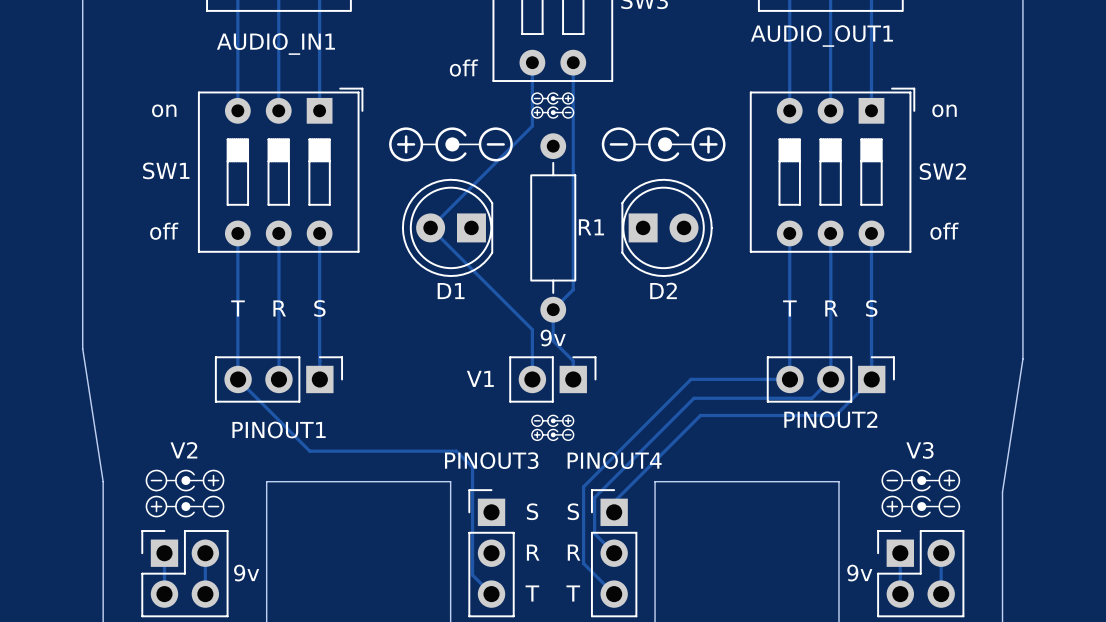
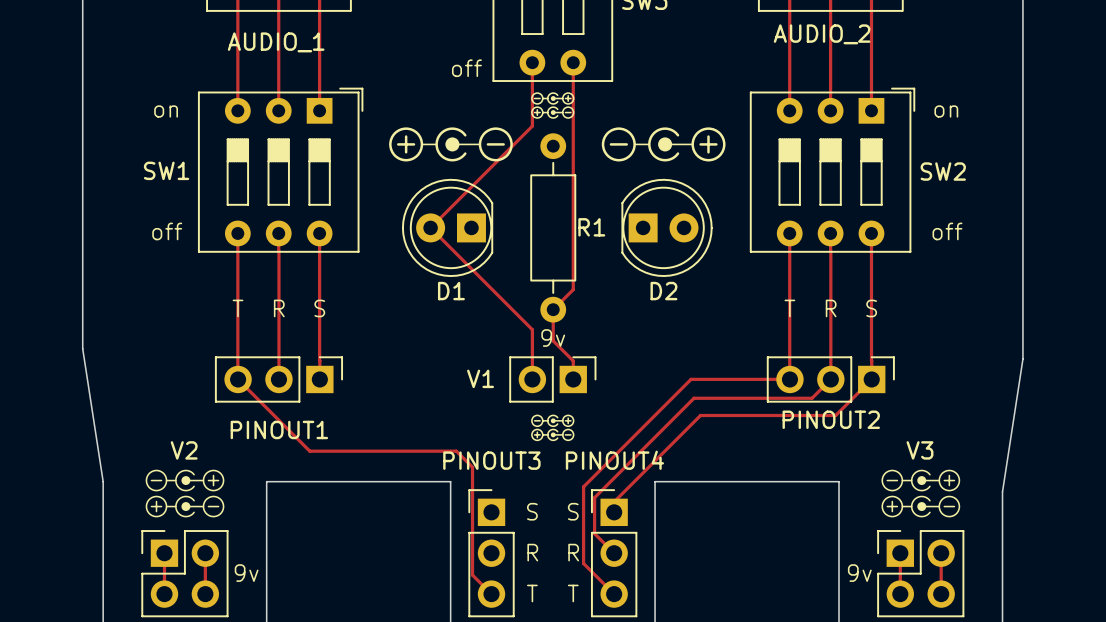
AUDIO_OUT1 name: AUDIO_OUT1 (821, 36) -> AUDIO_2 (822, 34)
AUDIO_IN1 name: AUDIO_IN1 (275, 44) -> AUDIO_1 (276, 42)

